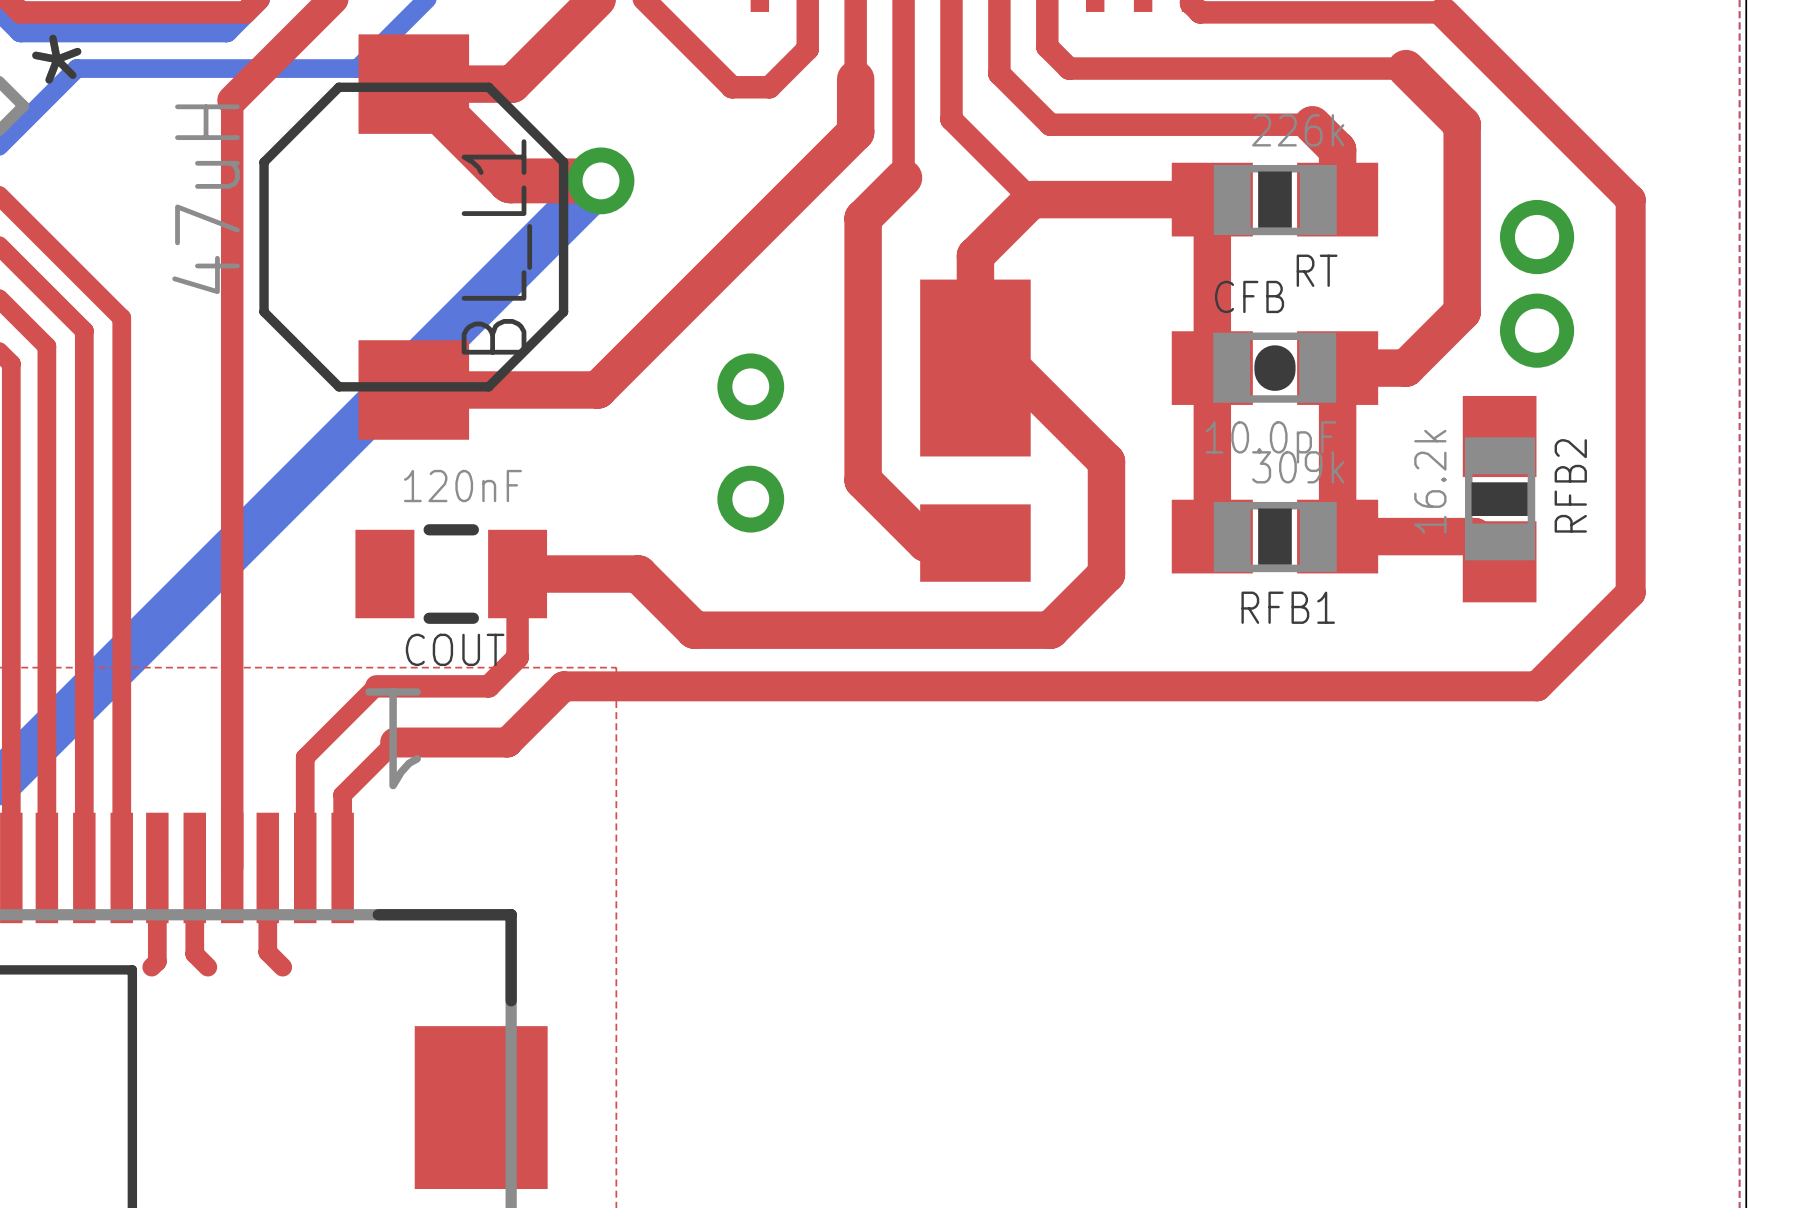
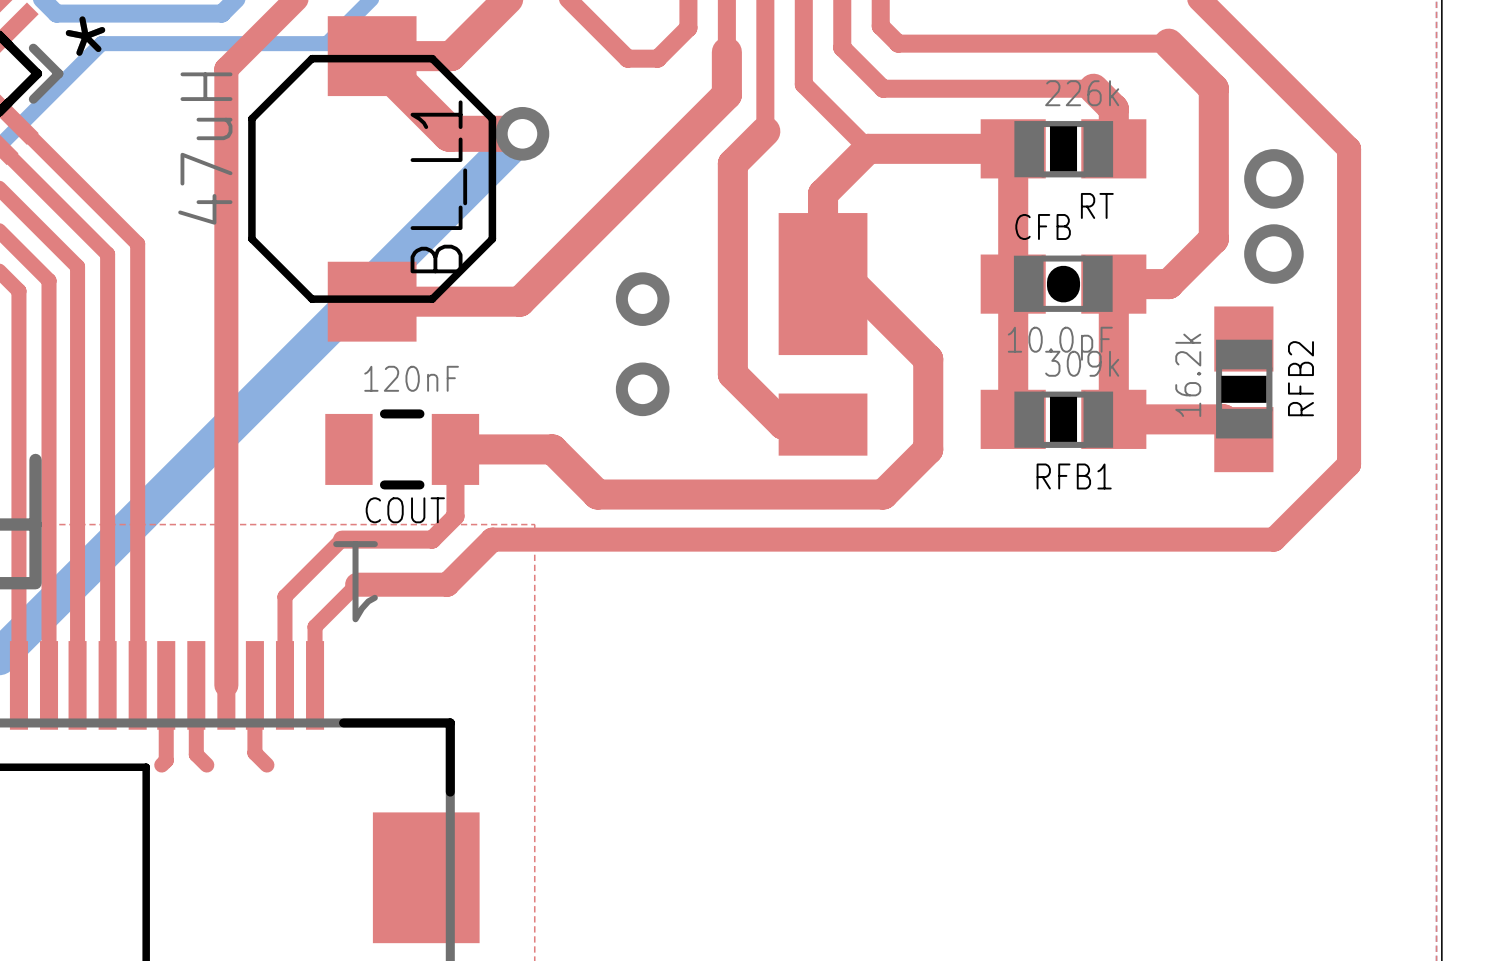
top track width: thin (232, 100) (232, 867) -> thick (226, 69) (226, 685)

